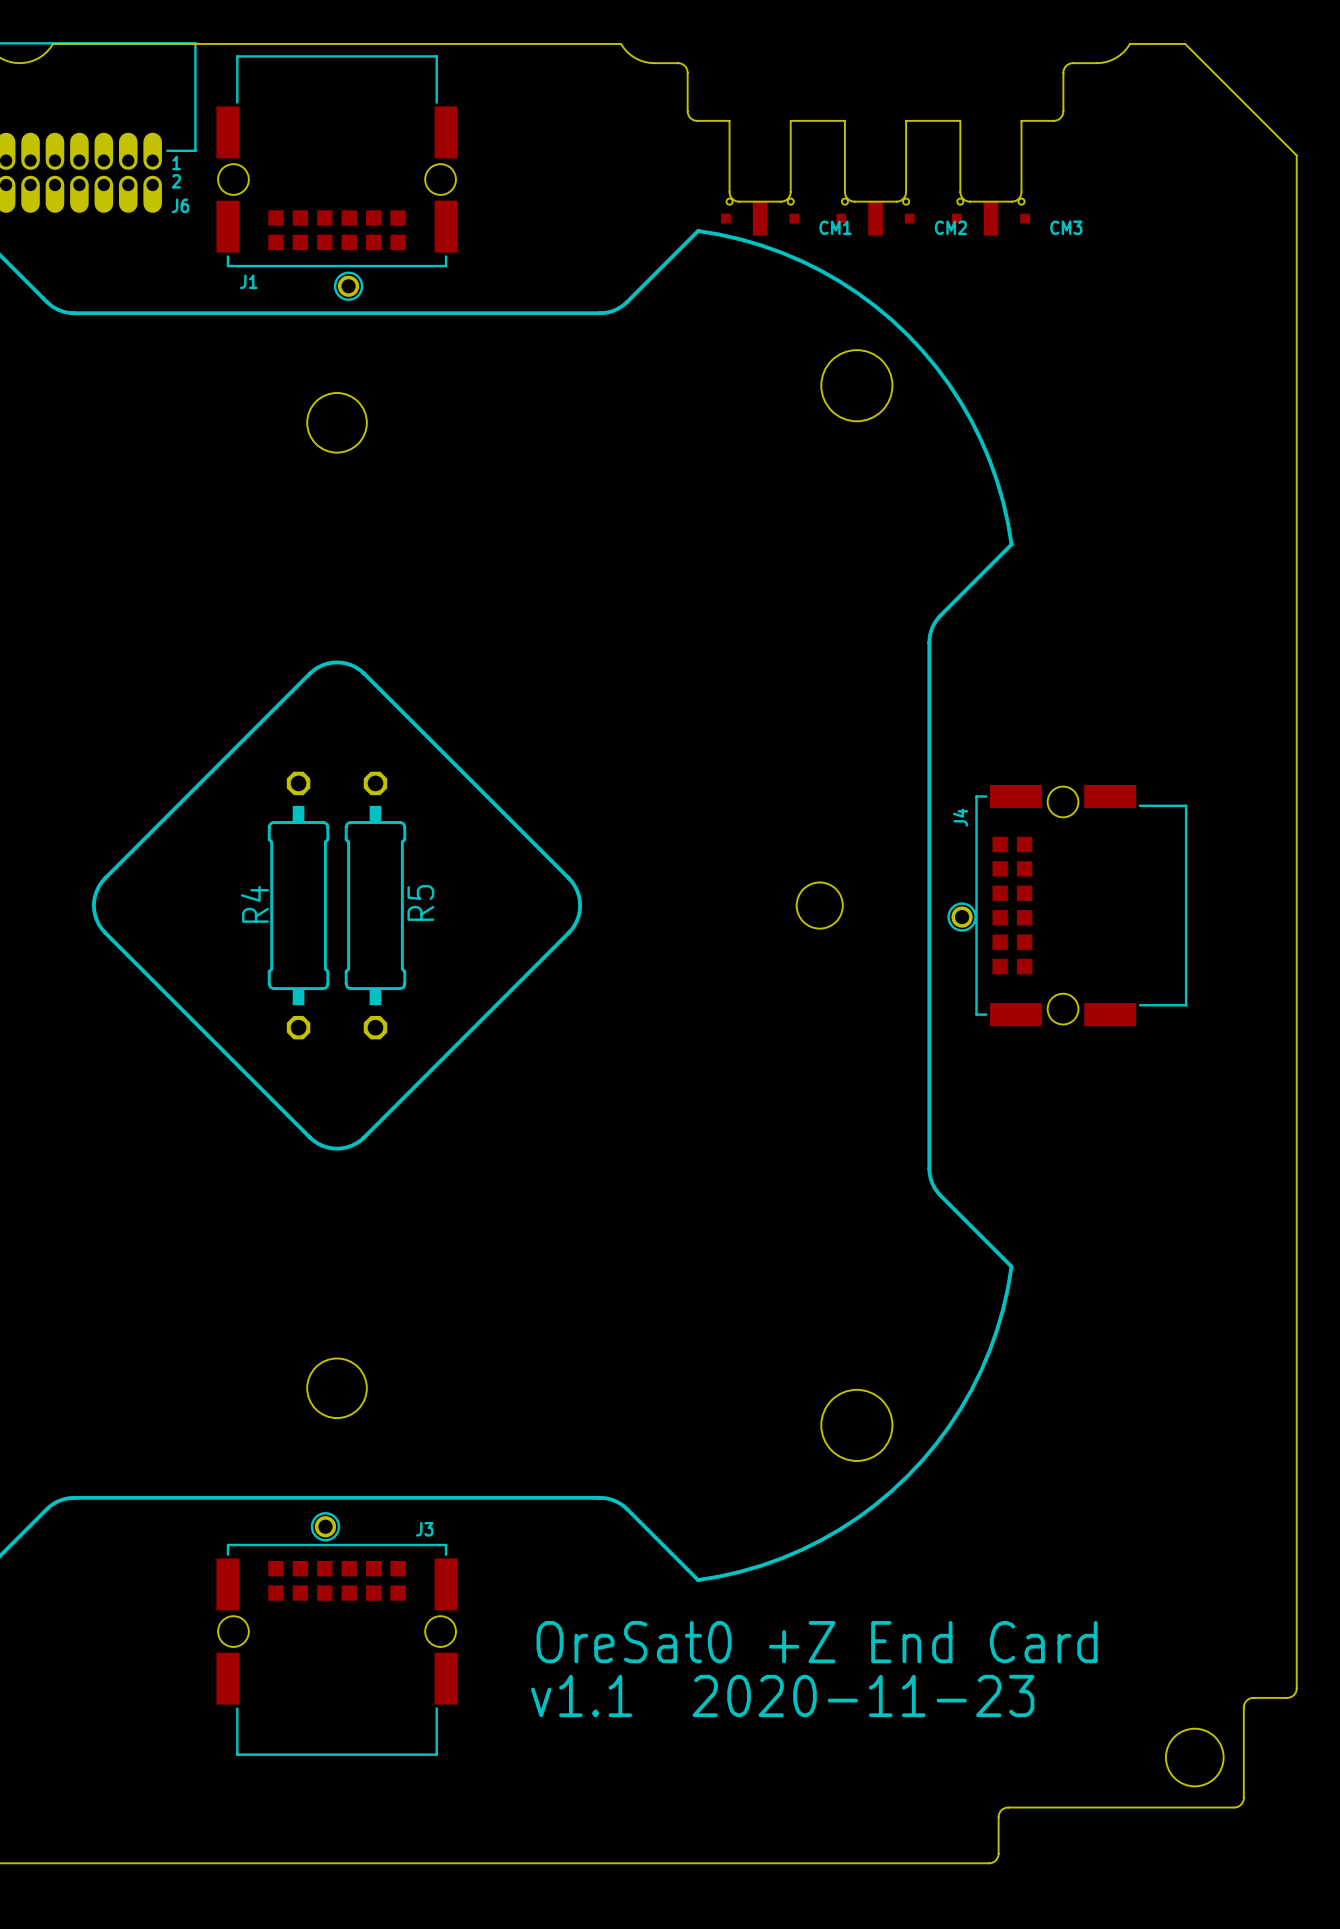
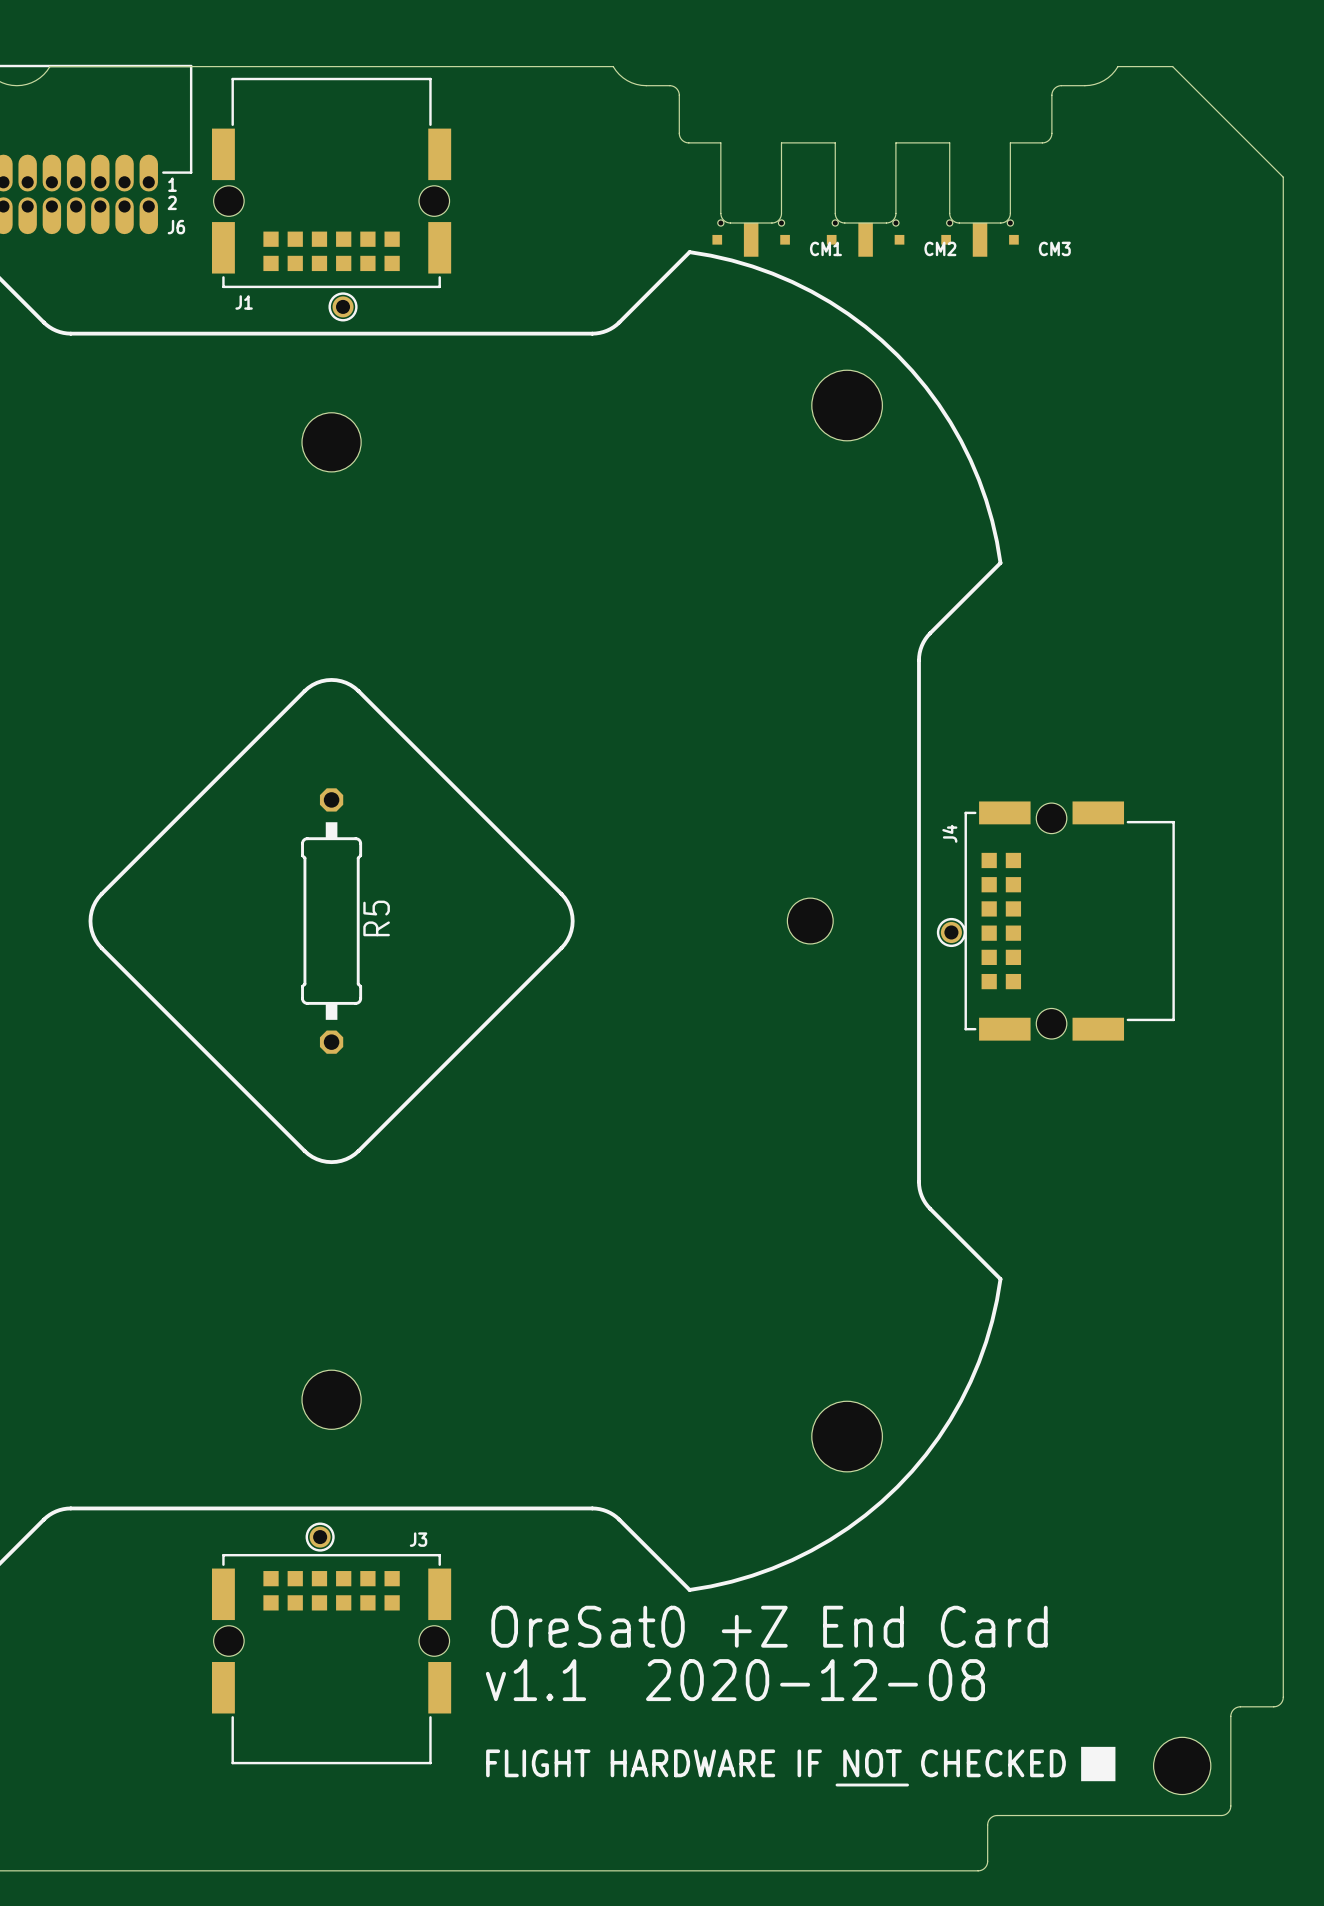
R4: (298, 905) -> none
R5 position: (375, 905) -> (331, 921)
text position: OreSat0 +Z End Card (817, 1642) -> OreSat0 +Z End Card (769, 1626)
text: v1.1 2020-11-23 (782, 1695) -> v1.1 2020-12-08 (735, 1680)
drawing: none -> [835, 1746, 1116, 1787]

